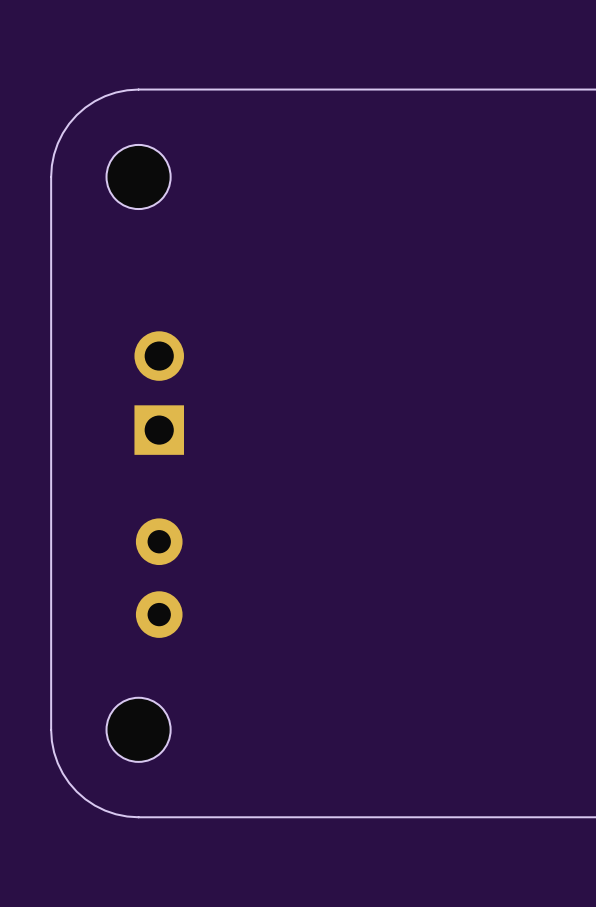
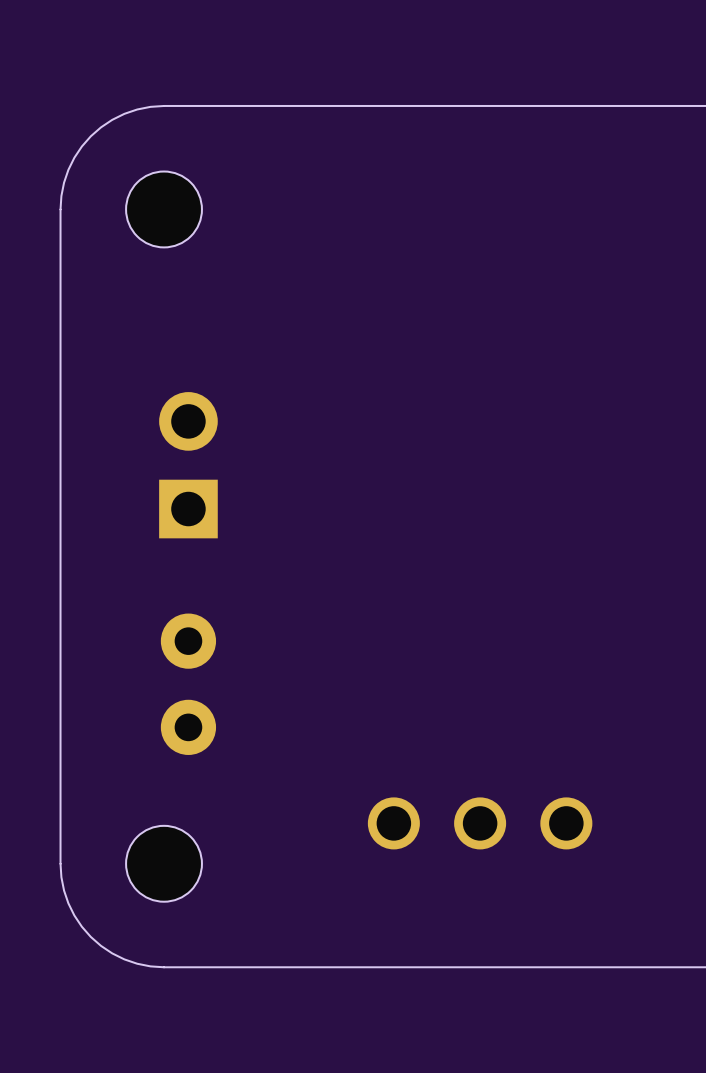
part: none -> (480, 823)

